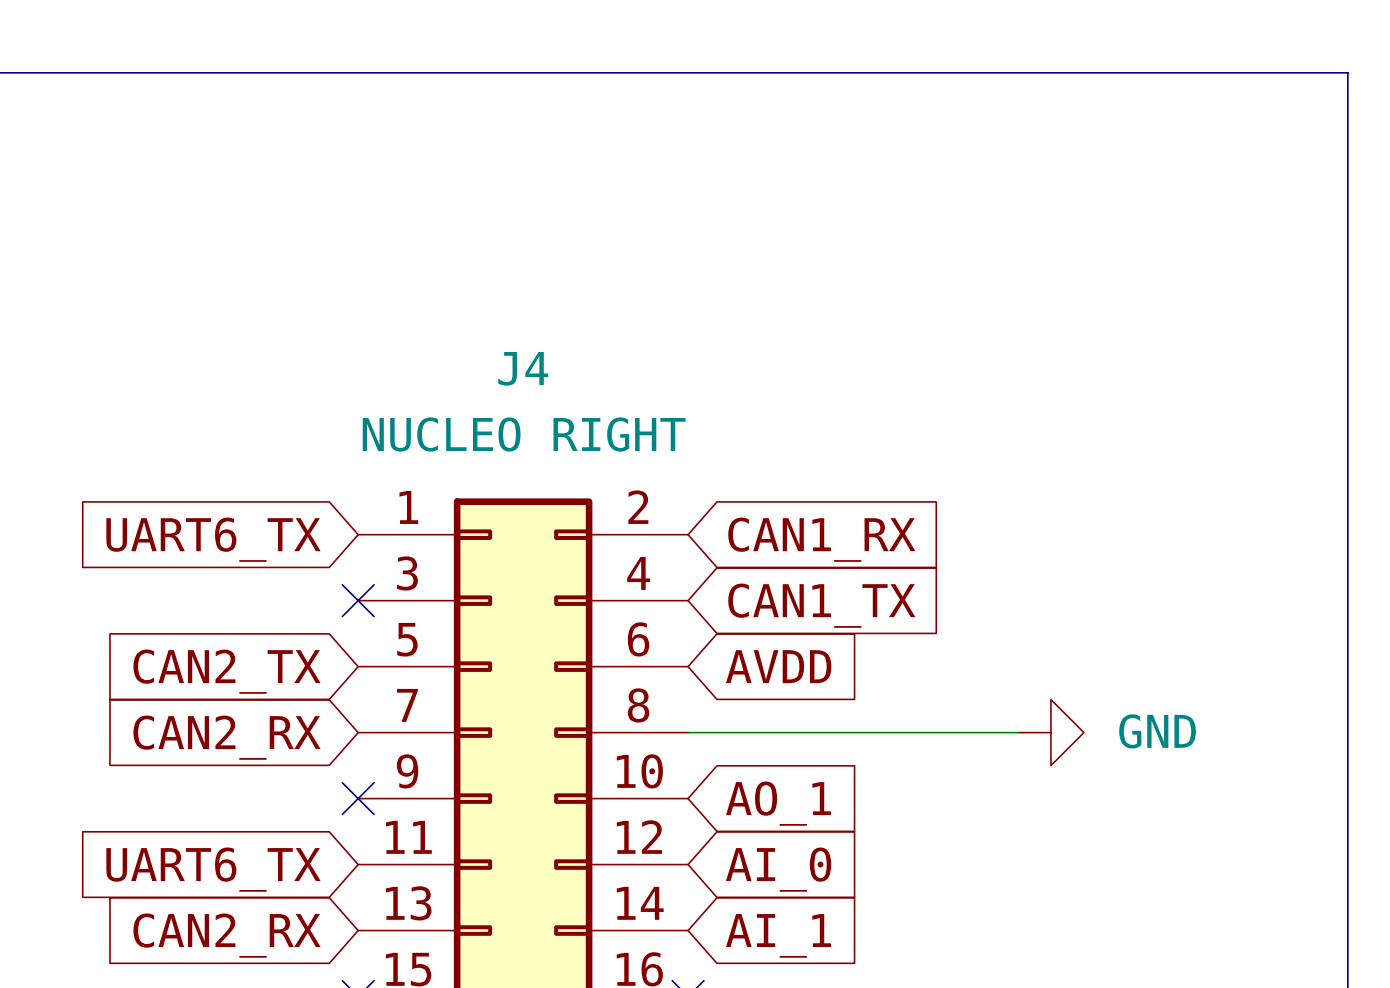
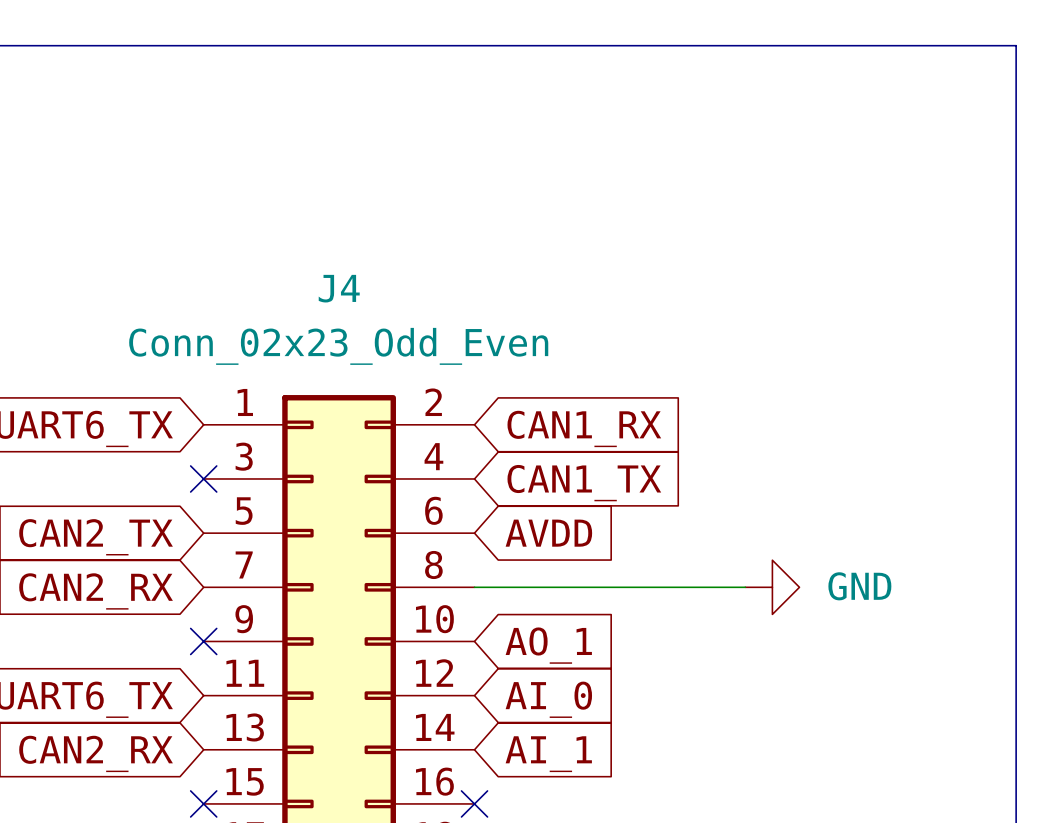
J4 value: NUCLEO RIGHT (524, 434) -> Conn_02x23_Odd_Even (338, 346)

